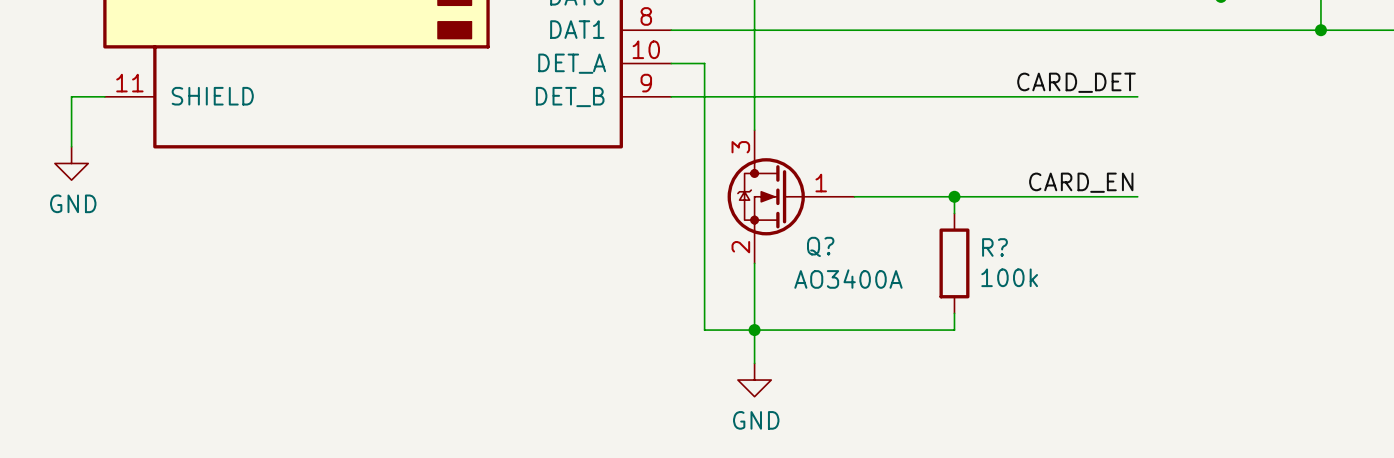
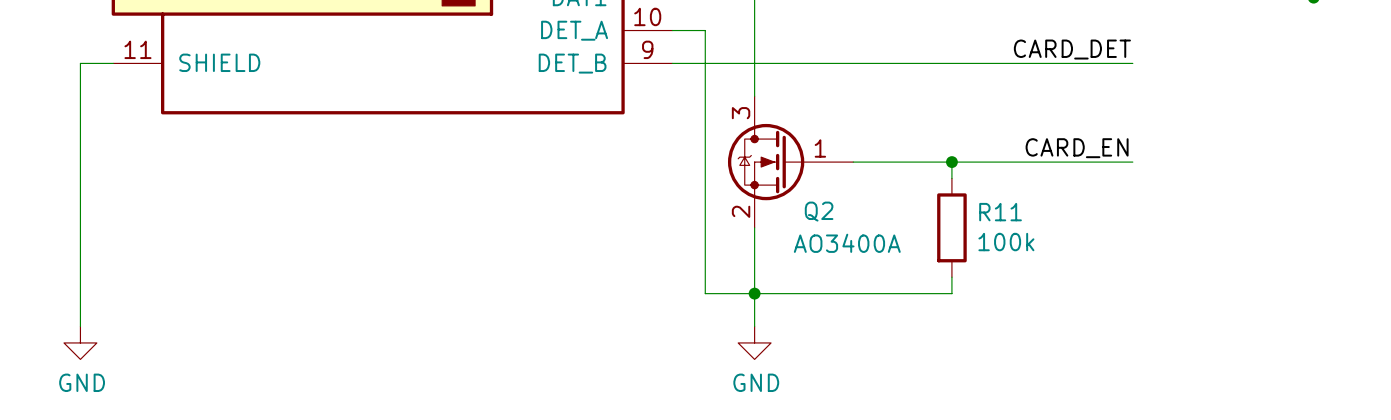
wire: none -> (80, 112) (80, 326)
power symbol position: GND (71, 163) -> GND (80, 342)
Q? name: Q? (820, 246) -> Q2 (819, 211)
R? name: R? (994, 247) -> R11 (1000, 212)

